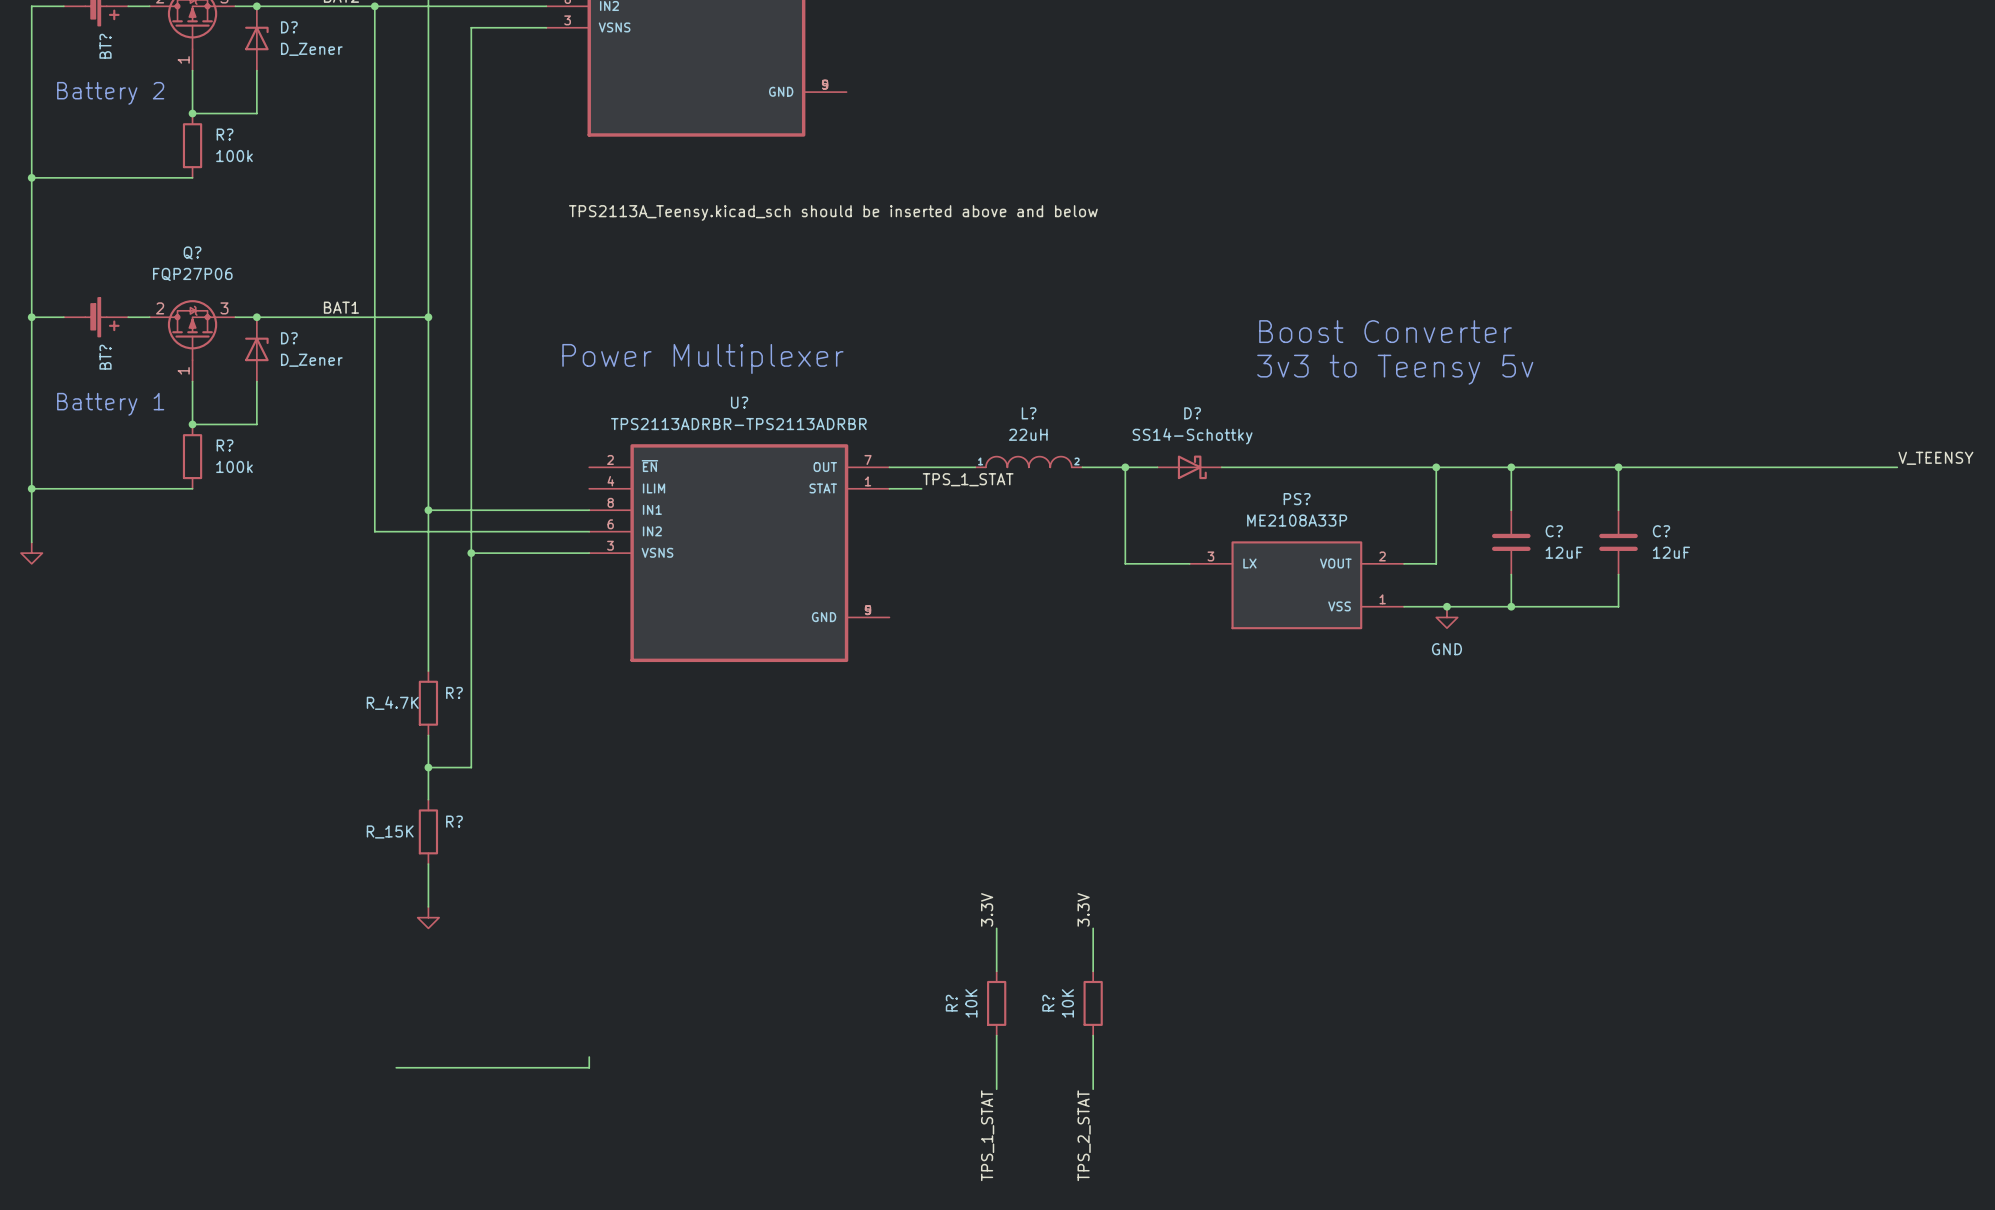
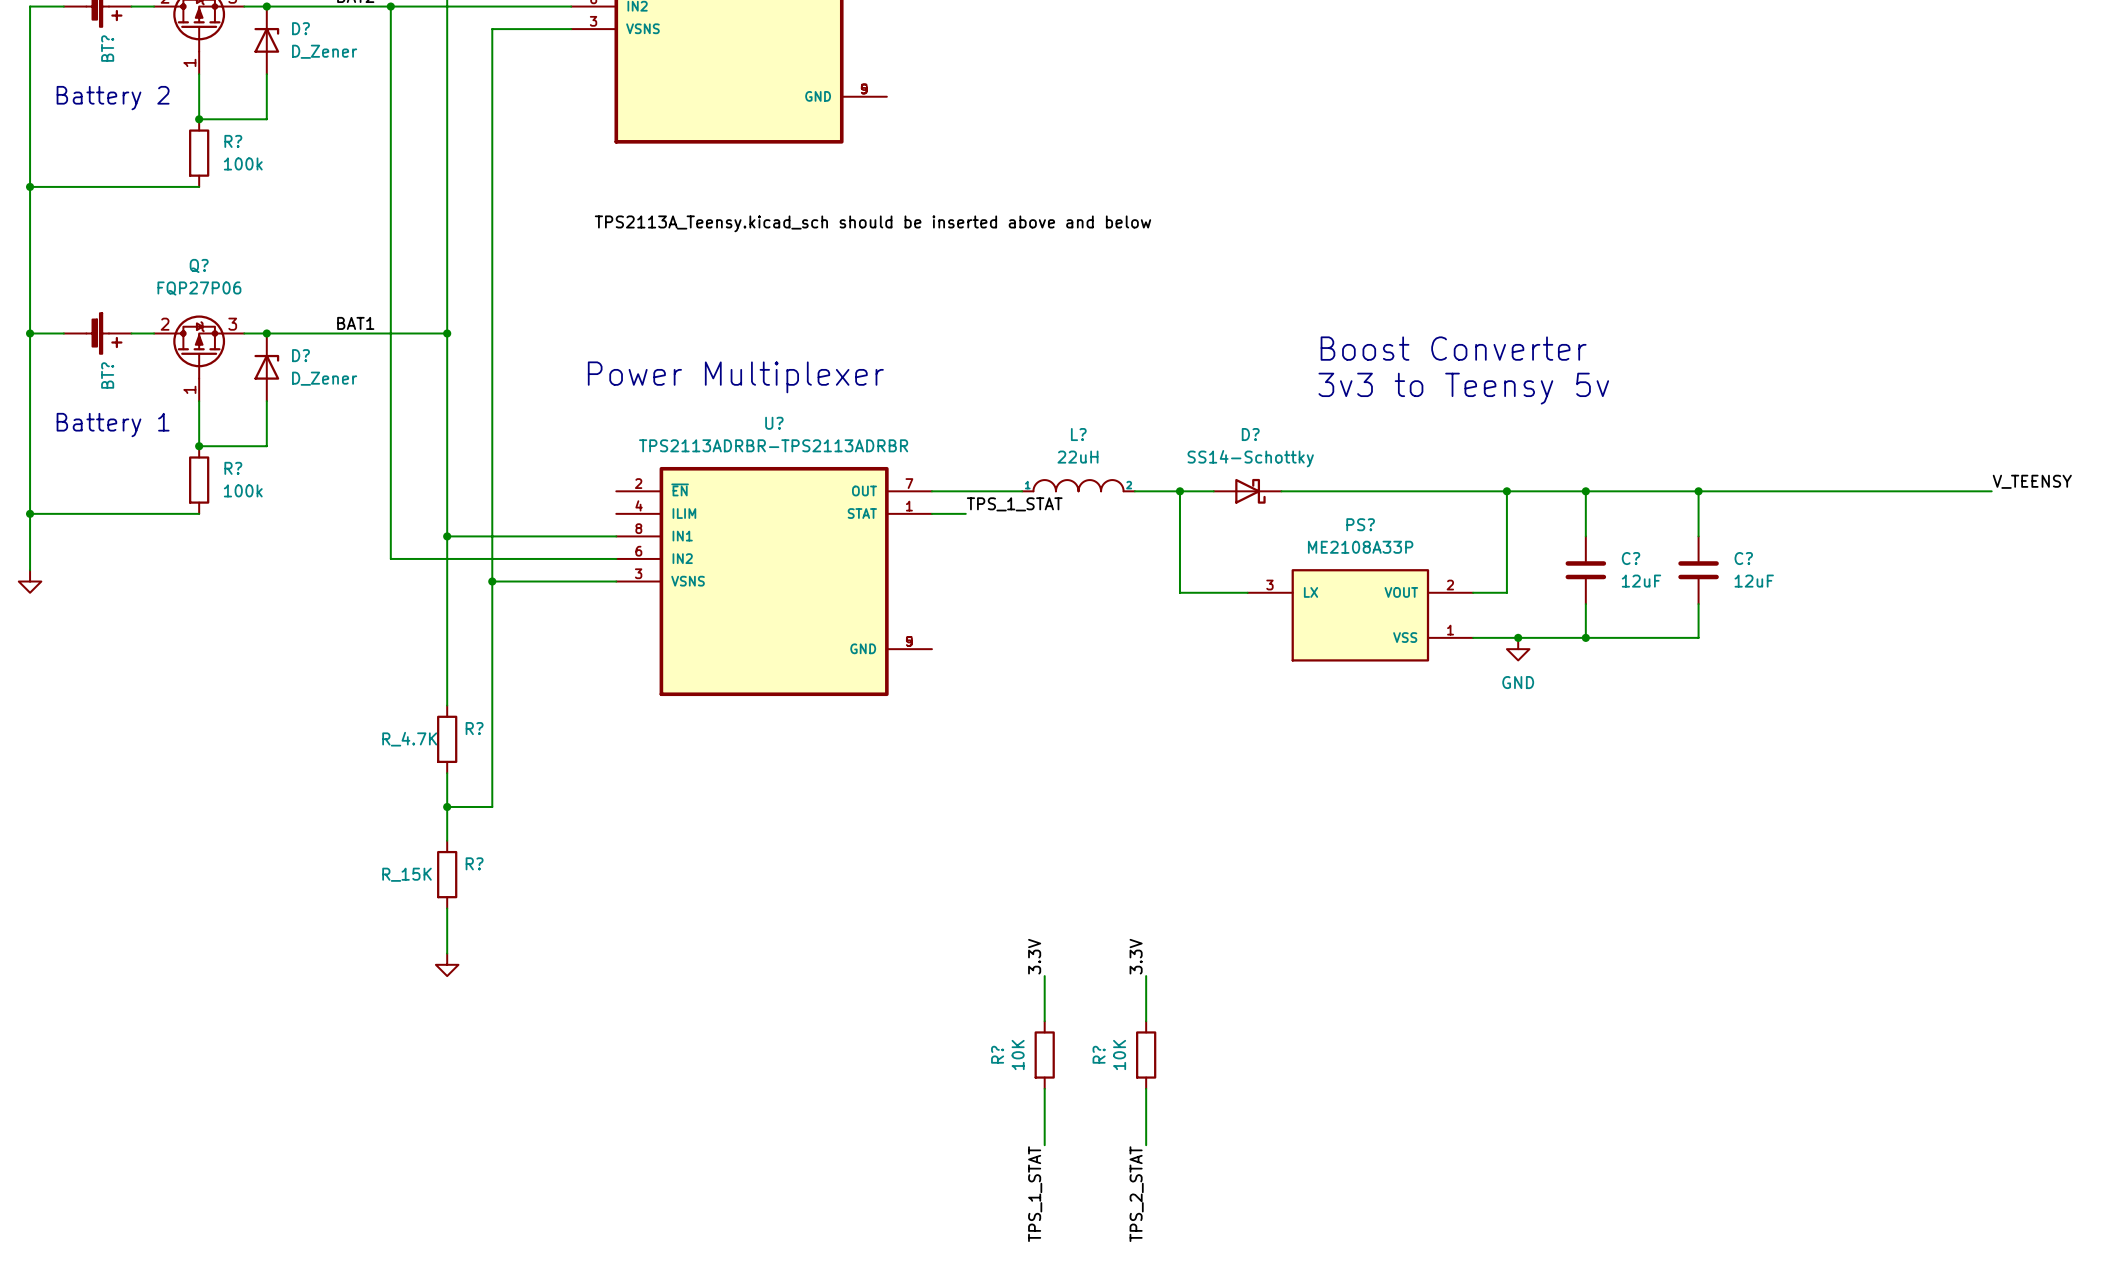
wire: (589, 1057) (589, 1067) (396, 1067) -> none

